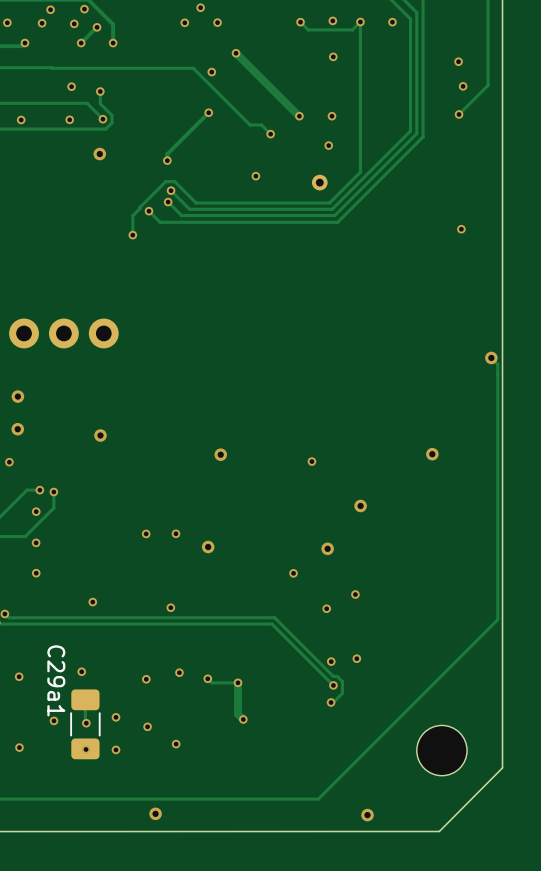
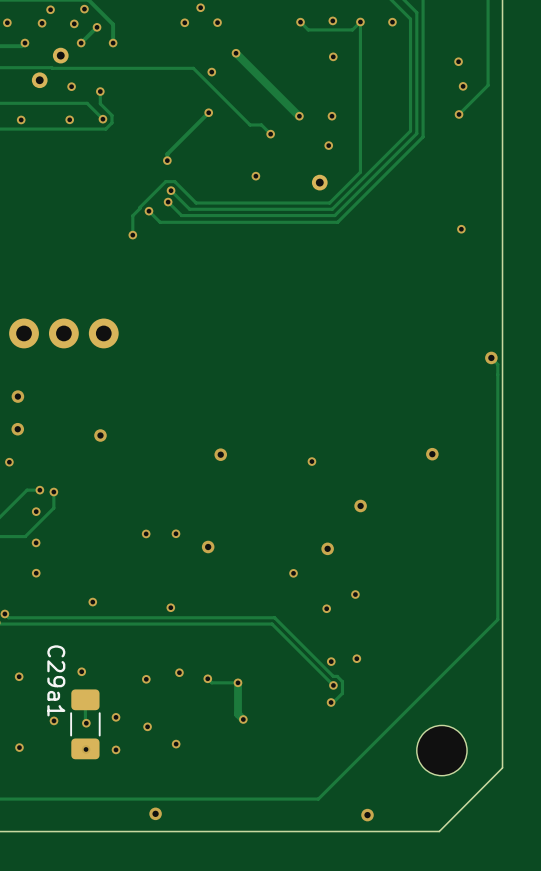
part: none -> (60, 55)
part: none -> (39, 80)
via: (99, 154) -> none

